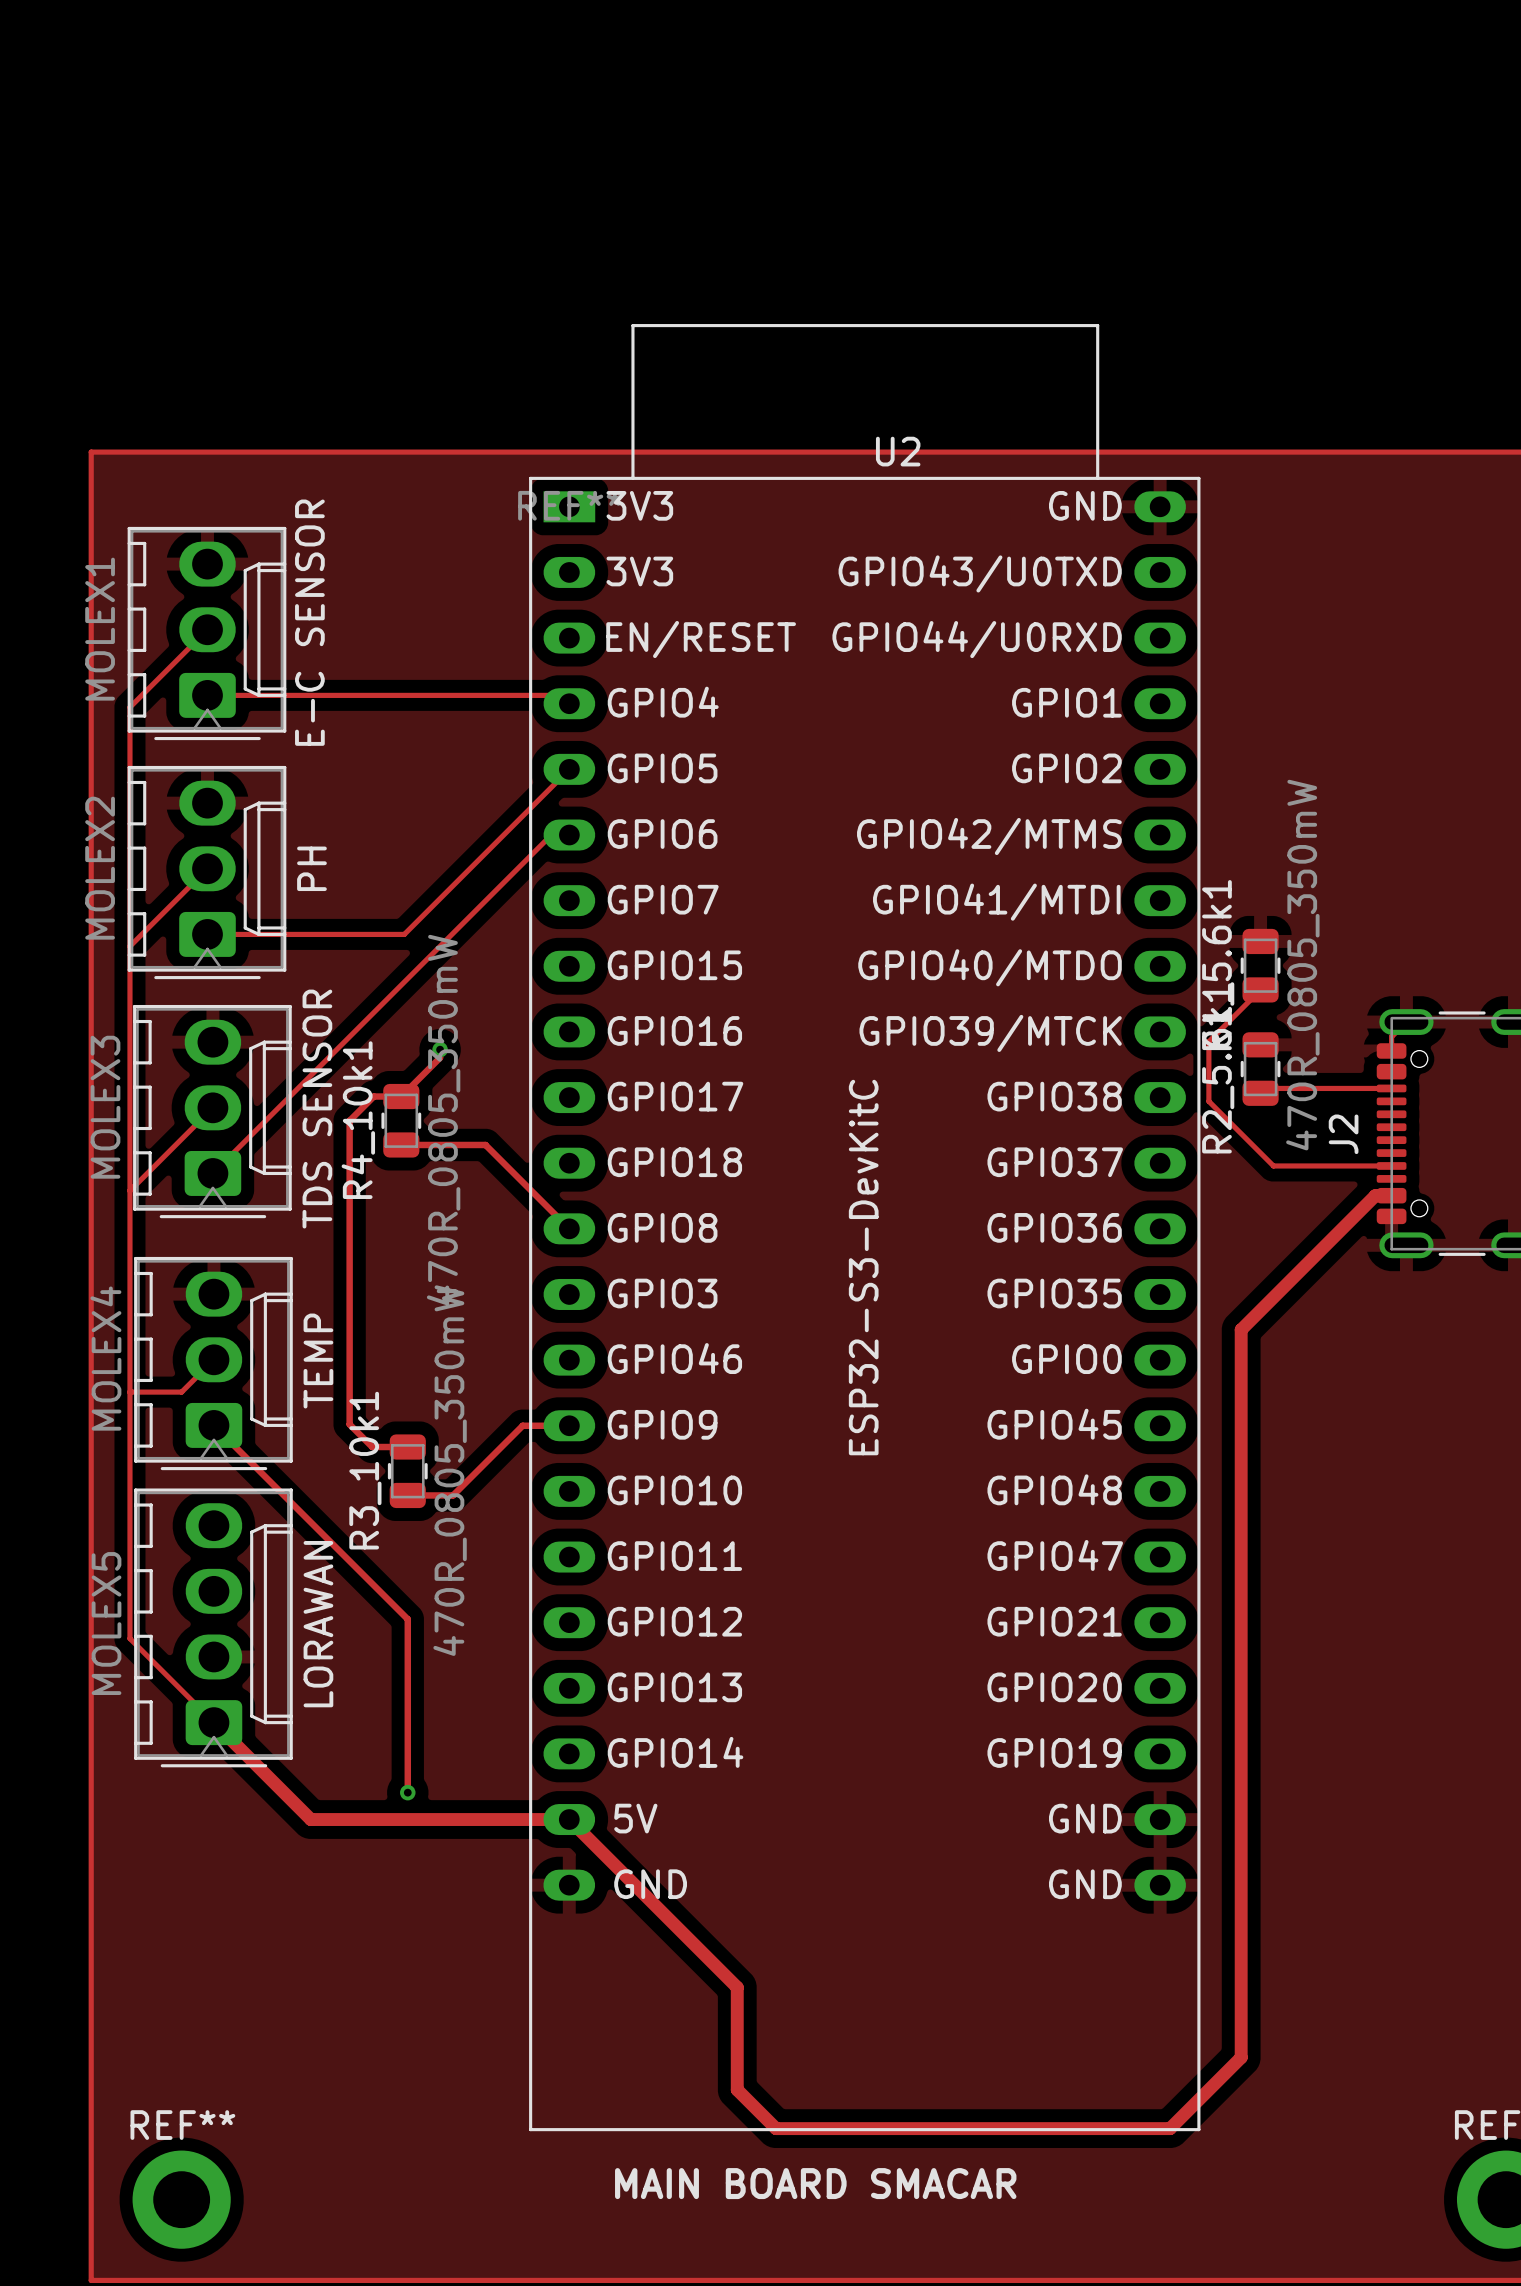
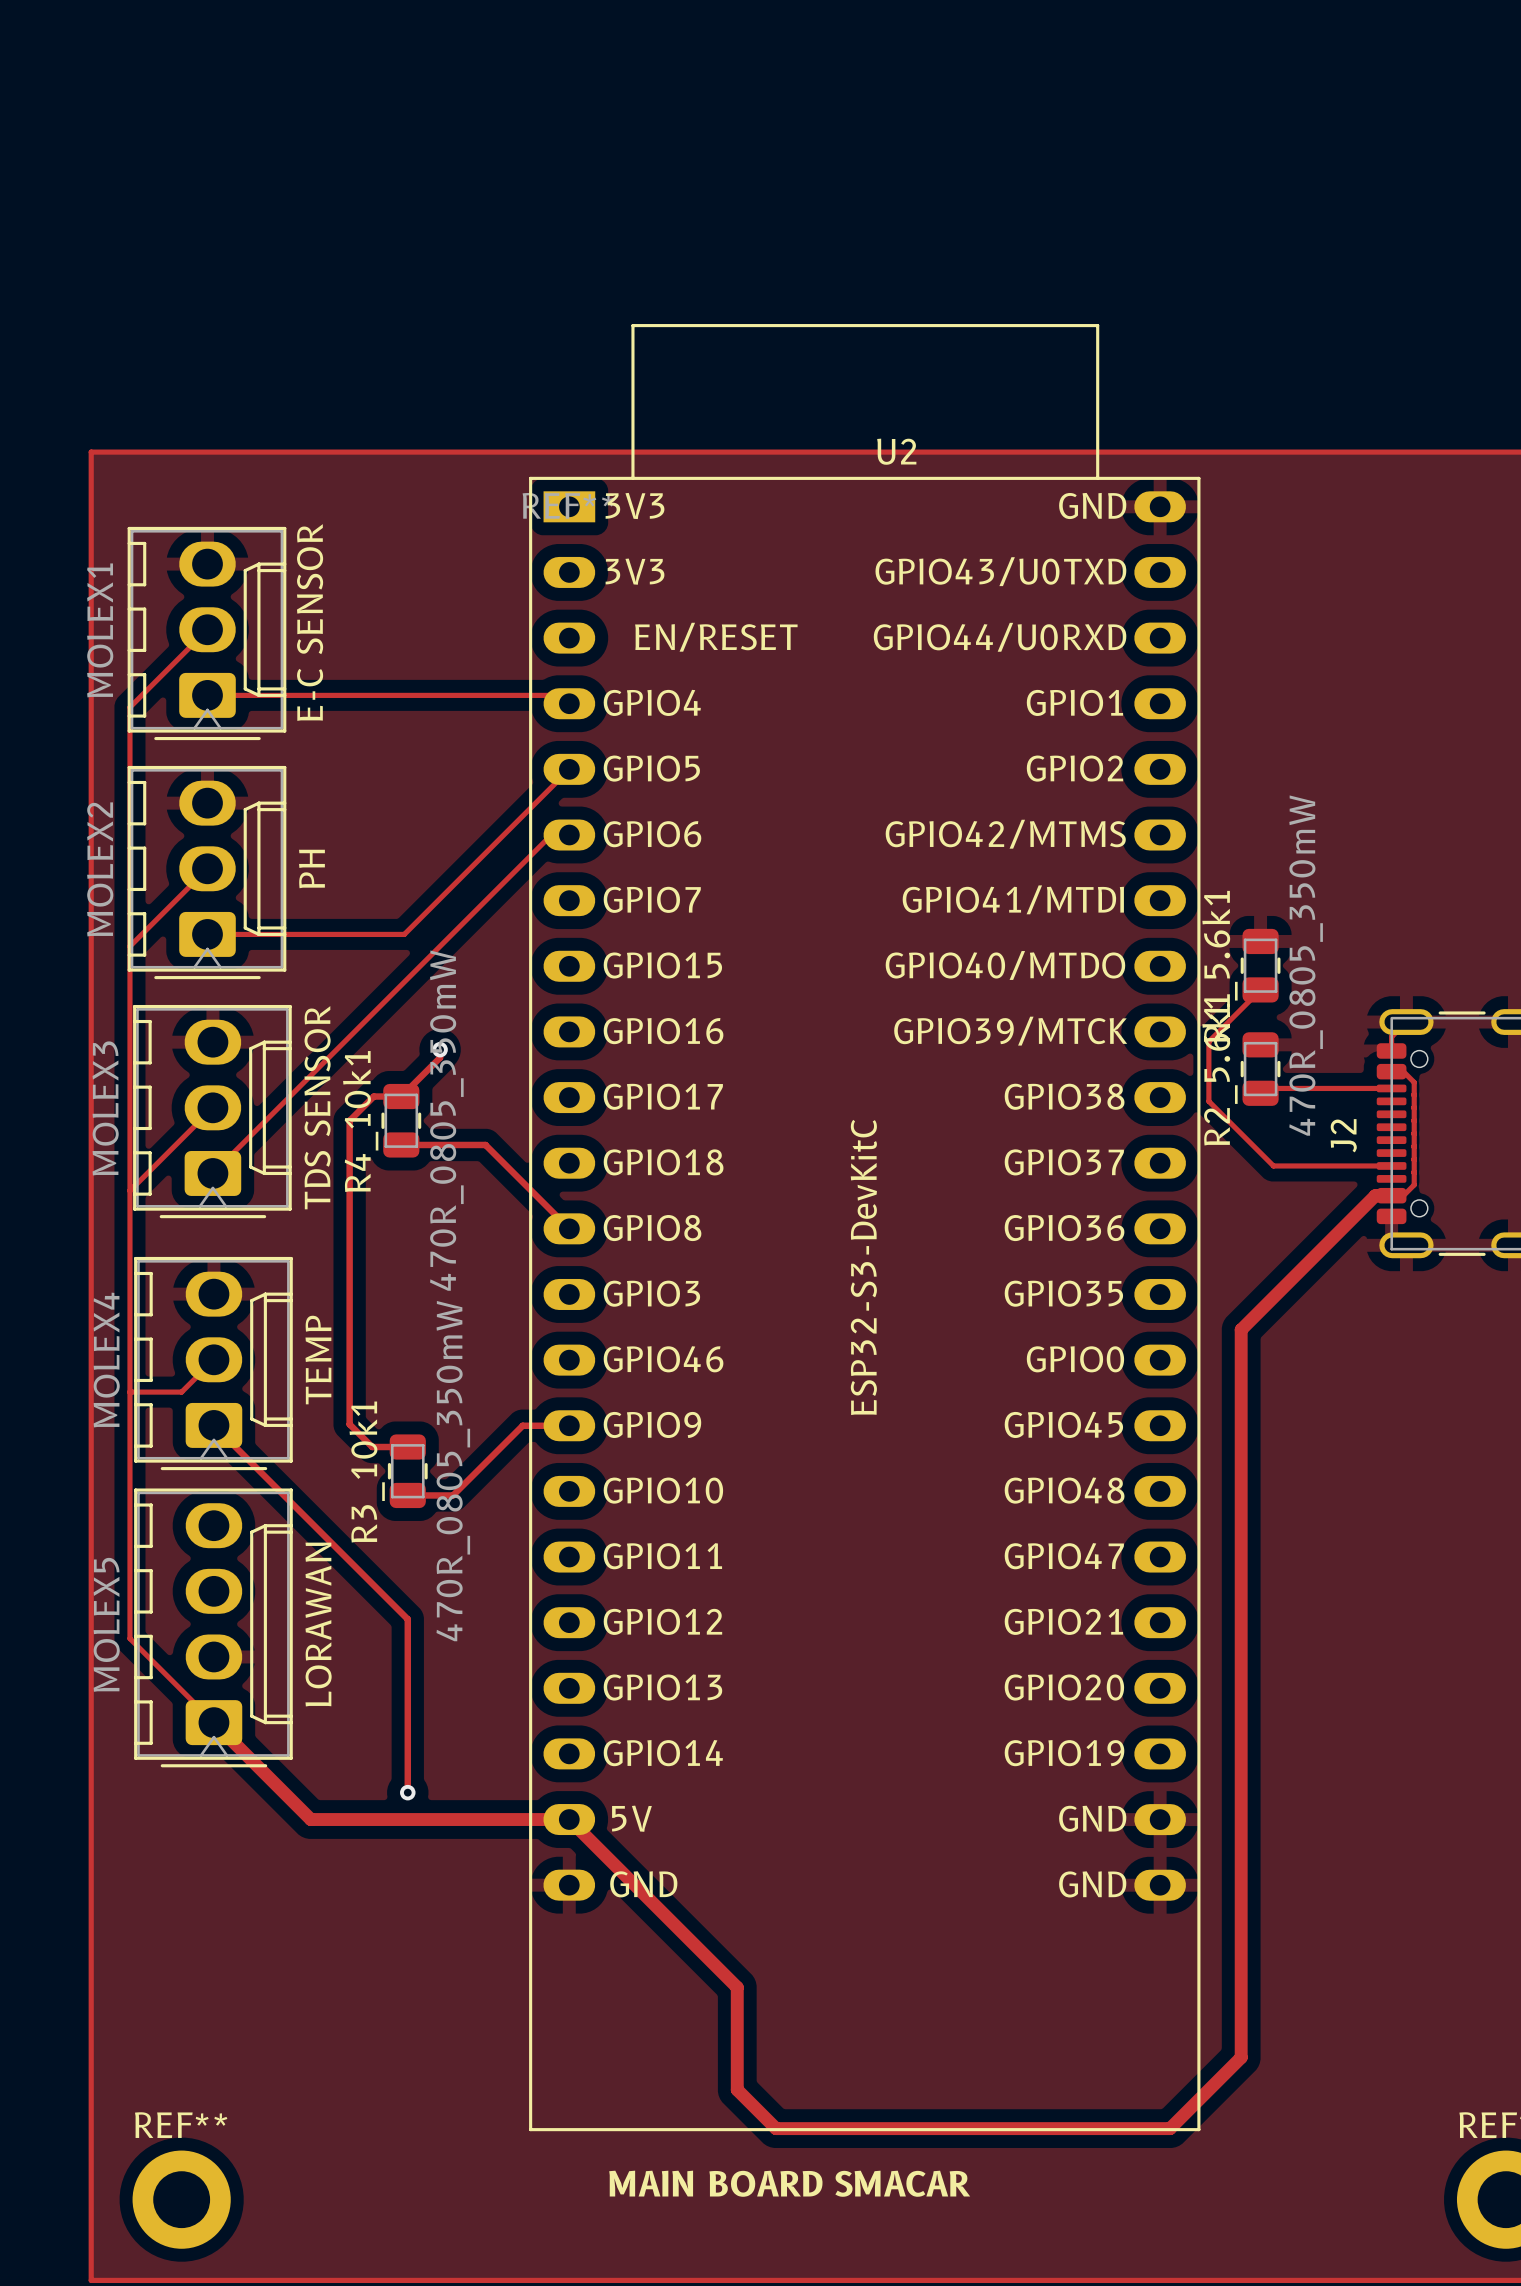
track: none -> (1391, 1071) (1403, 1071) (1414, 1082) (1414, 1184) (1403, 1195) (1391, 1195)

